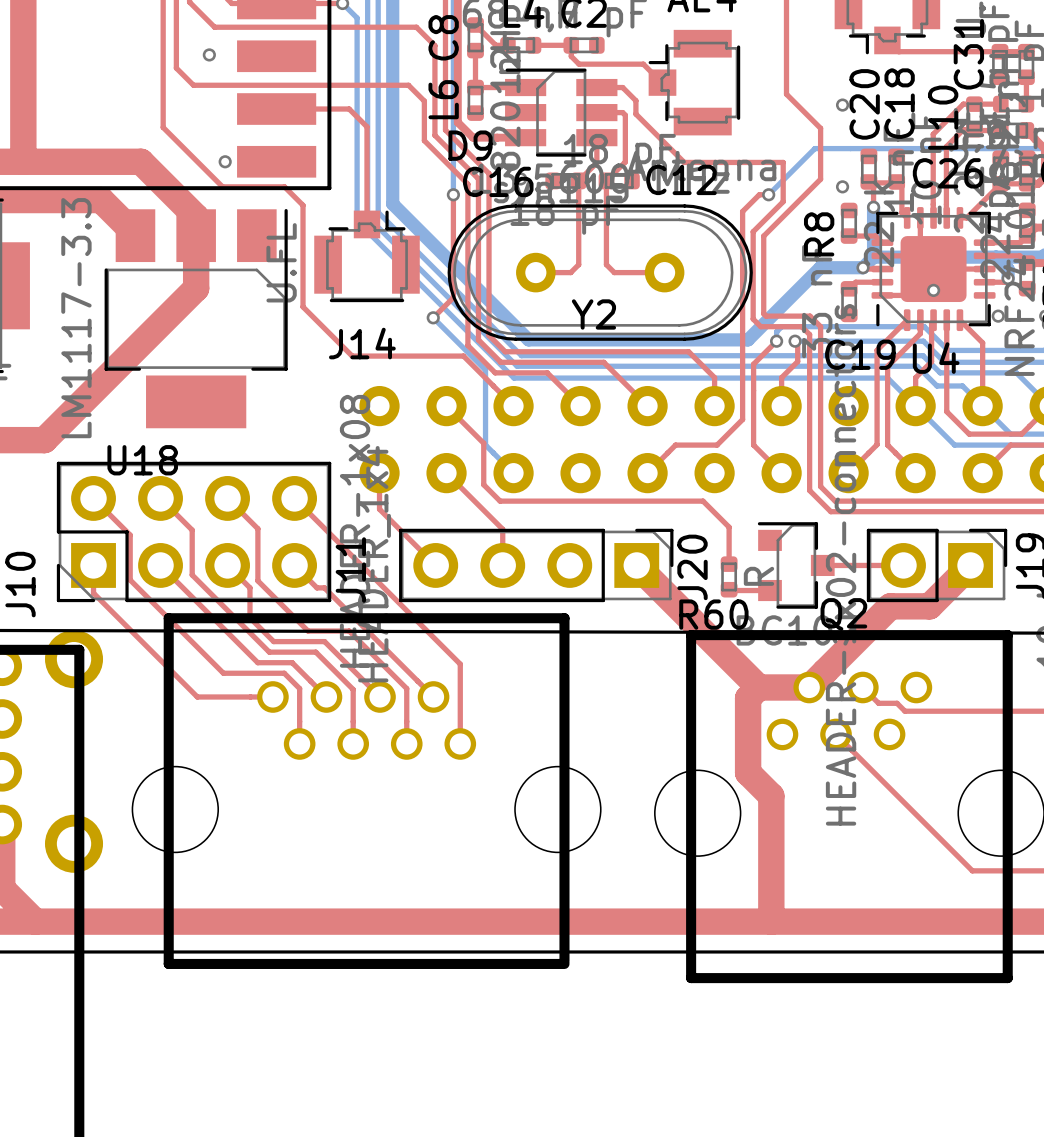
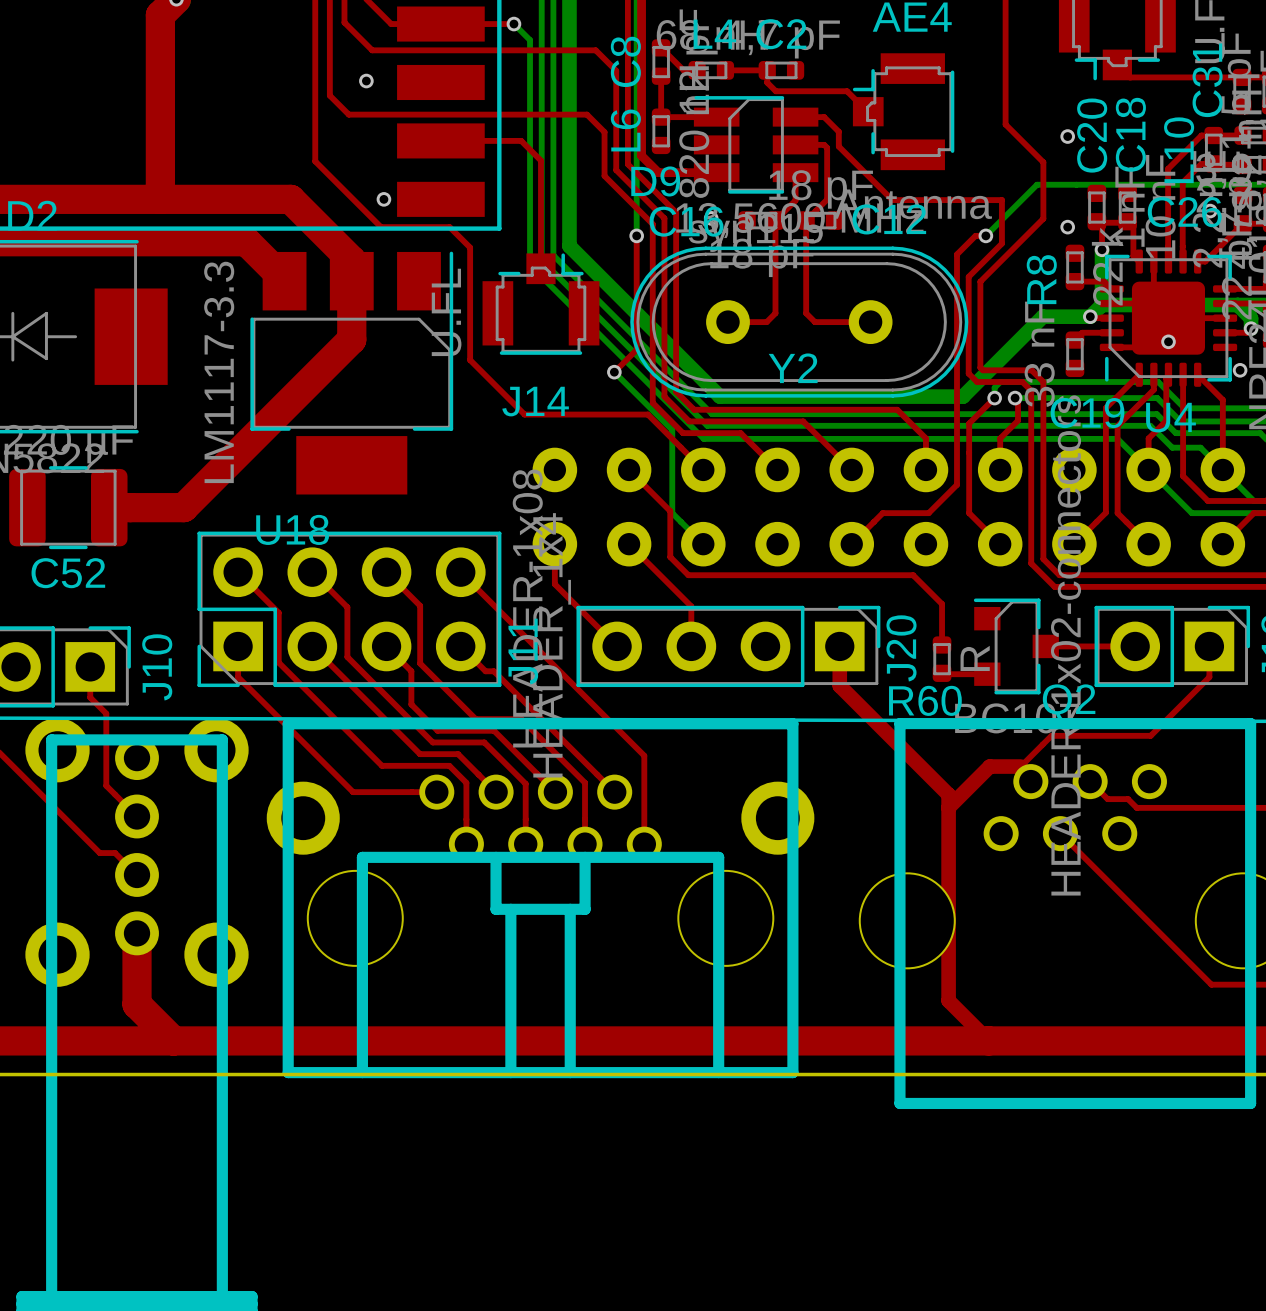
top track: (636, 565) (758, 687) -> none
top track: (970, 565) (929, 606) (890, 606) (809, 687) (758, 687) -> (1209, 646) (1209, 677) (1150, 735) (1051, 735) (1020, 766)
part footprint: [132, 613, 601, 969] -> [266, 718, 815, 1079]
top track: none -> (1020, 766) (989, 766) (948, 807)
top track: (758, 687) (748, 698) (748, 772) (771, 796) (771, 921) -> (839, 646) (839, 685) (948, 794) (948, 1000) (988, 1040)

